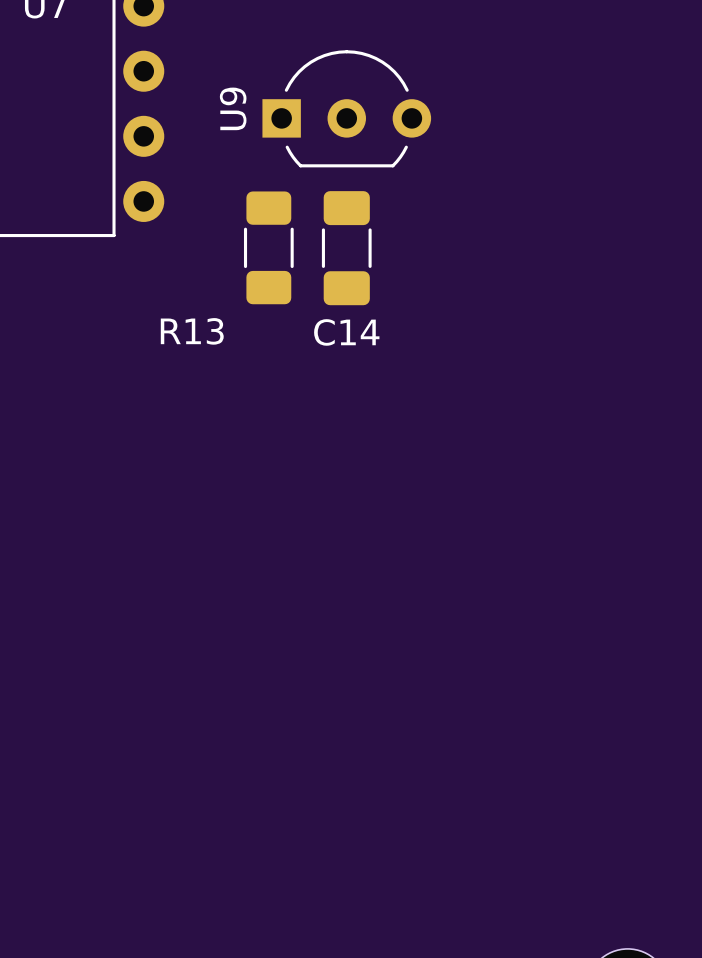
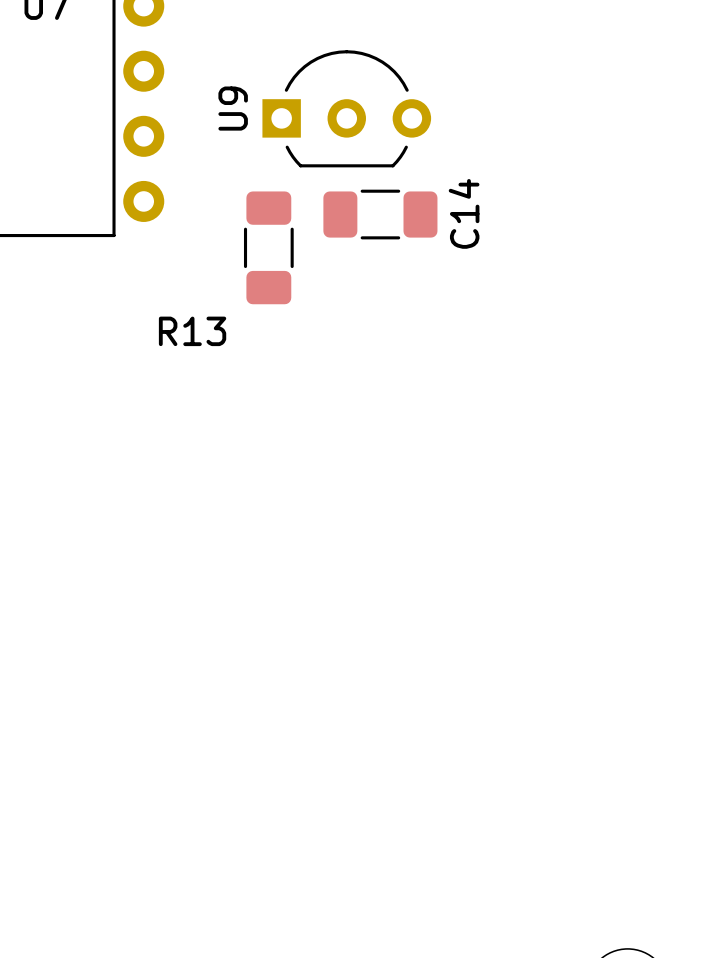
C14 rotation: 0° (346, 248) -> 90° clockwise (380, 214)
C14 name position: C14 (346, 332) -> C14 (464, 213)

